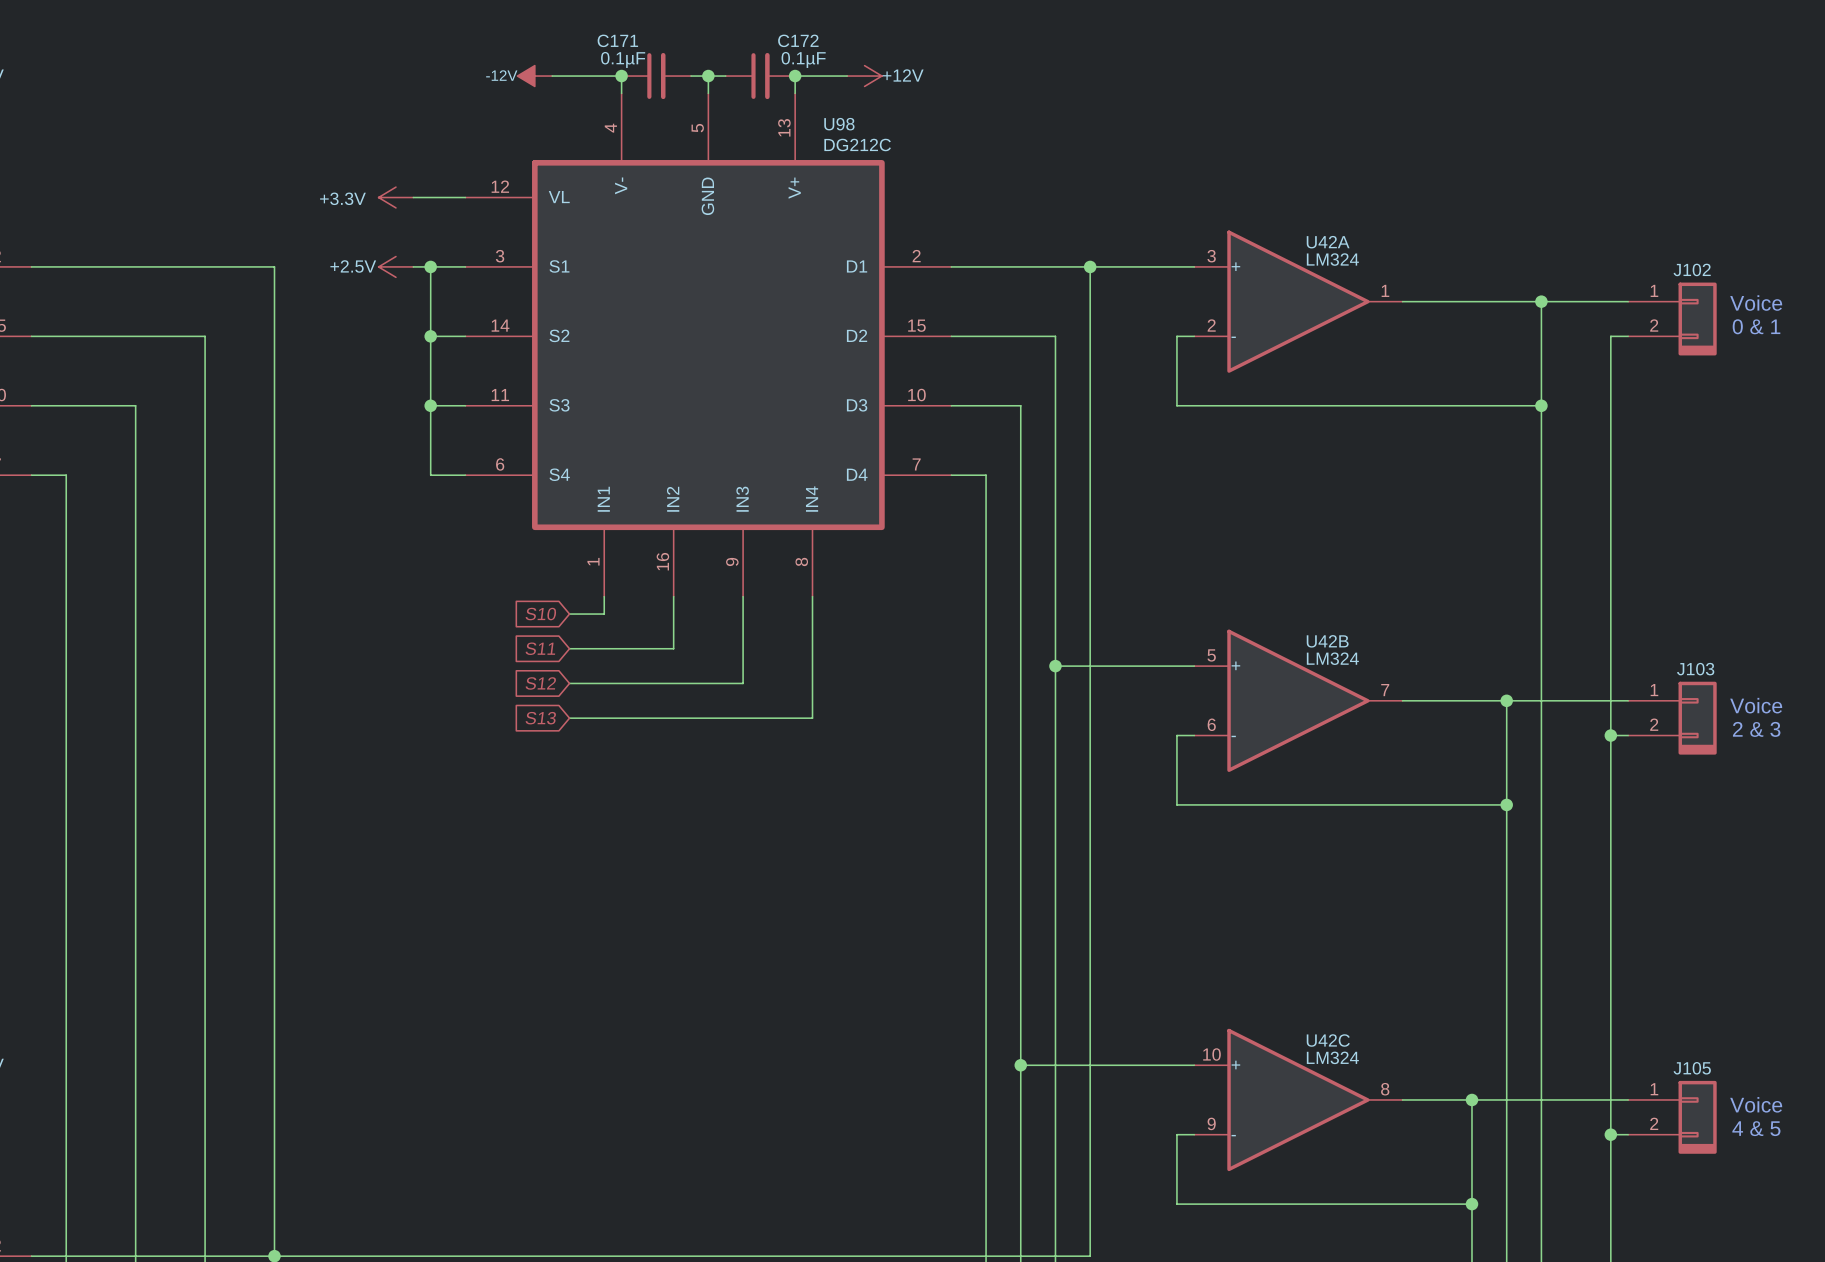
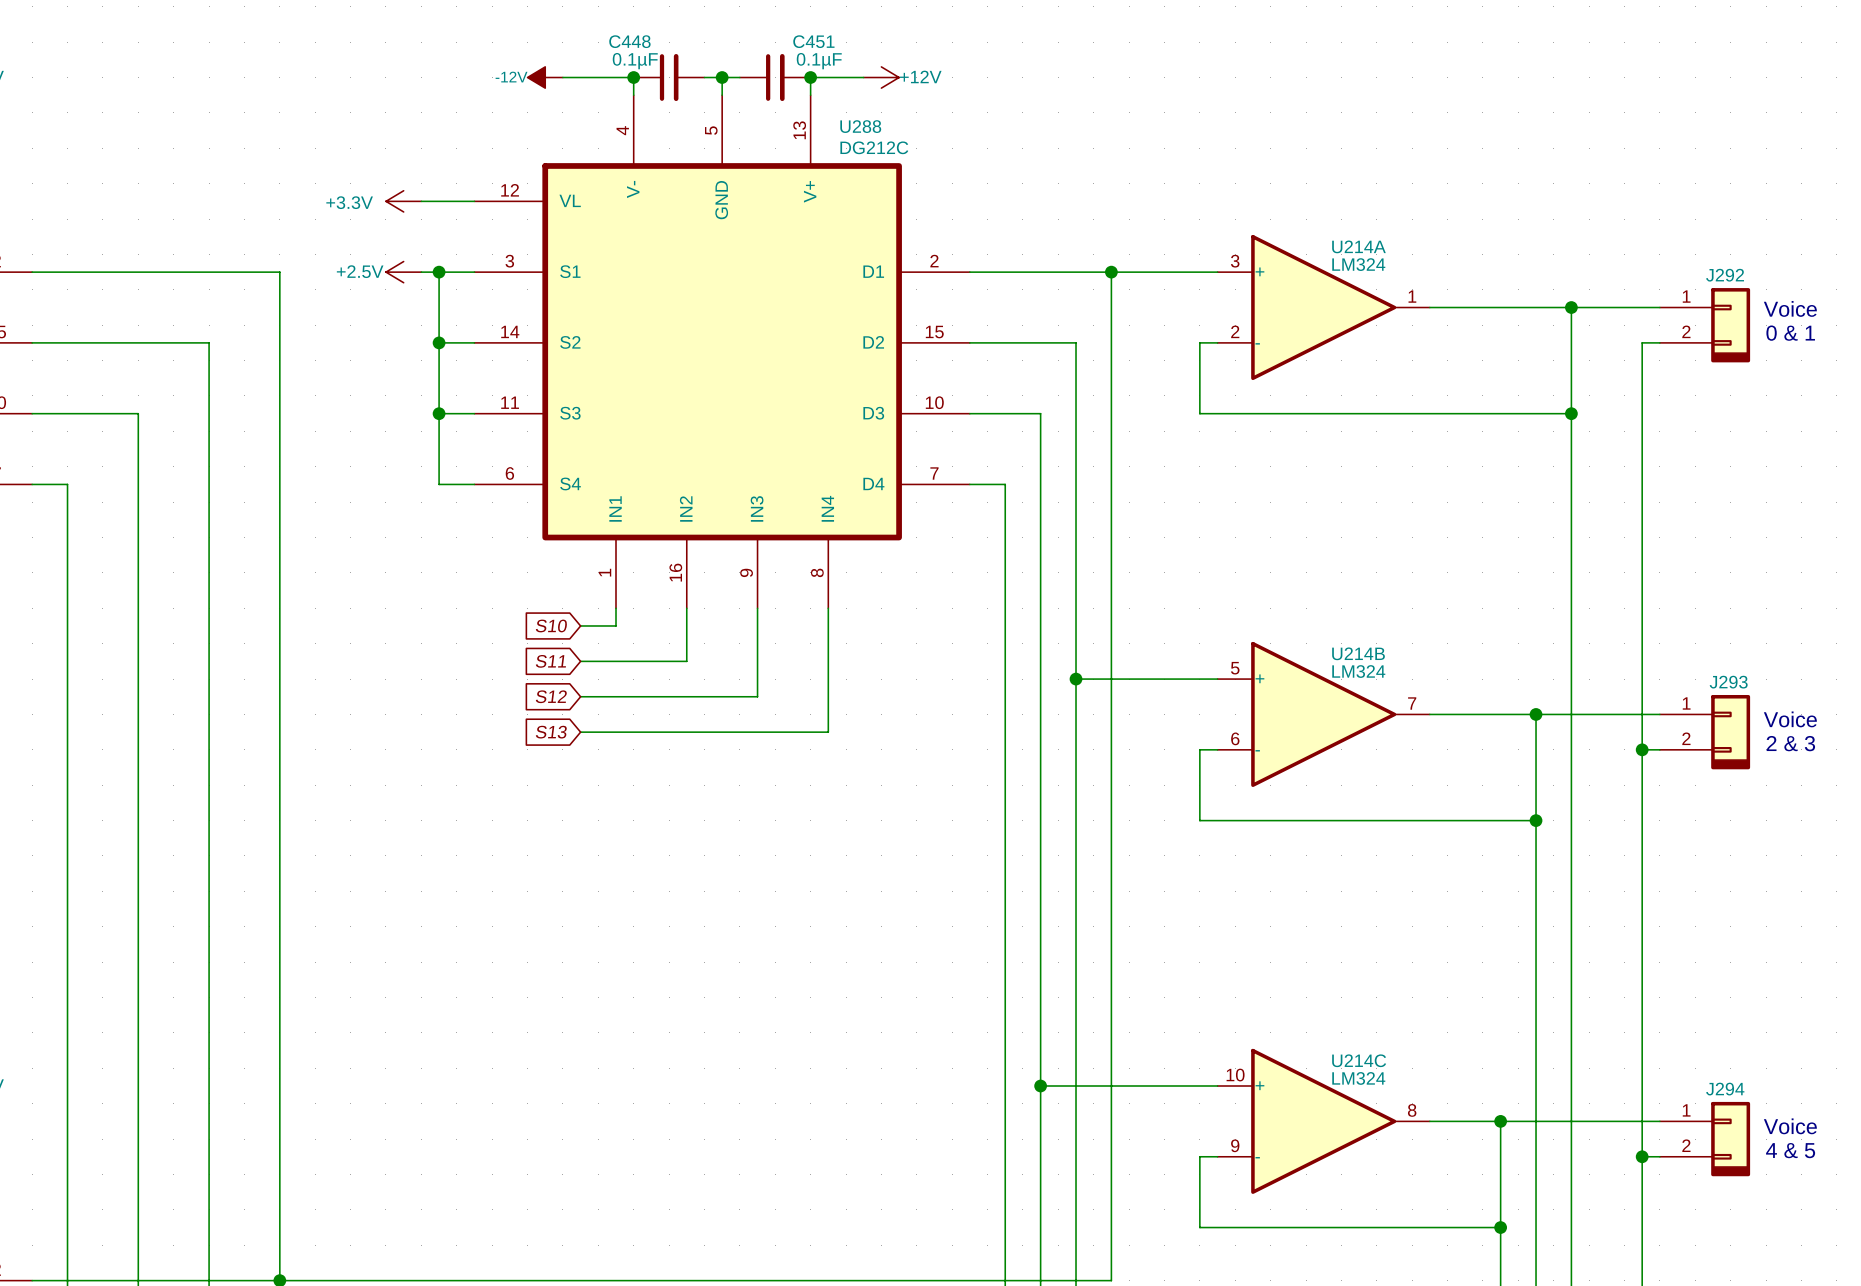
C171 name: C171 (617, 40) -> C448 (629, 41)
C172 name: C172 (798, 40) -> C451 (813, 41)
U98 name: U98 (839, 124) -> U288 (860, 126)
U42A name: U42A (1328, 242) -> U214A (1358, 246)
J102 name: J102 (1692, 269) -> J292 (1725, 275)
U42B name: U42B (1327, 641) -> U214B (1358, 653)
J103 name: J103 (1695, 669) -> J293 (1728, 682)
U42C name: U42C (1328, 1040) -> U214C (1359, 1060)
J105 name: J105 (1692, 1068) -> J294 (1725, 1089)

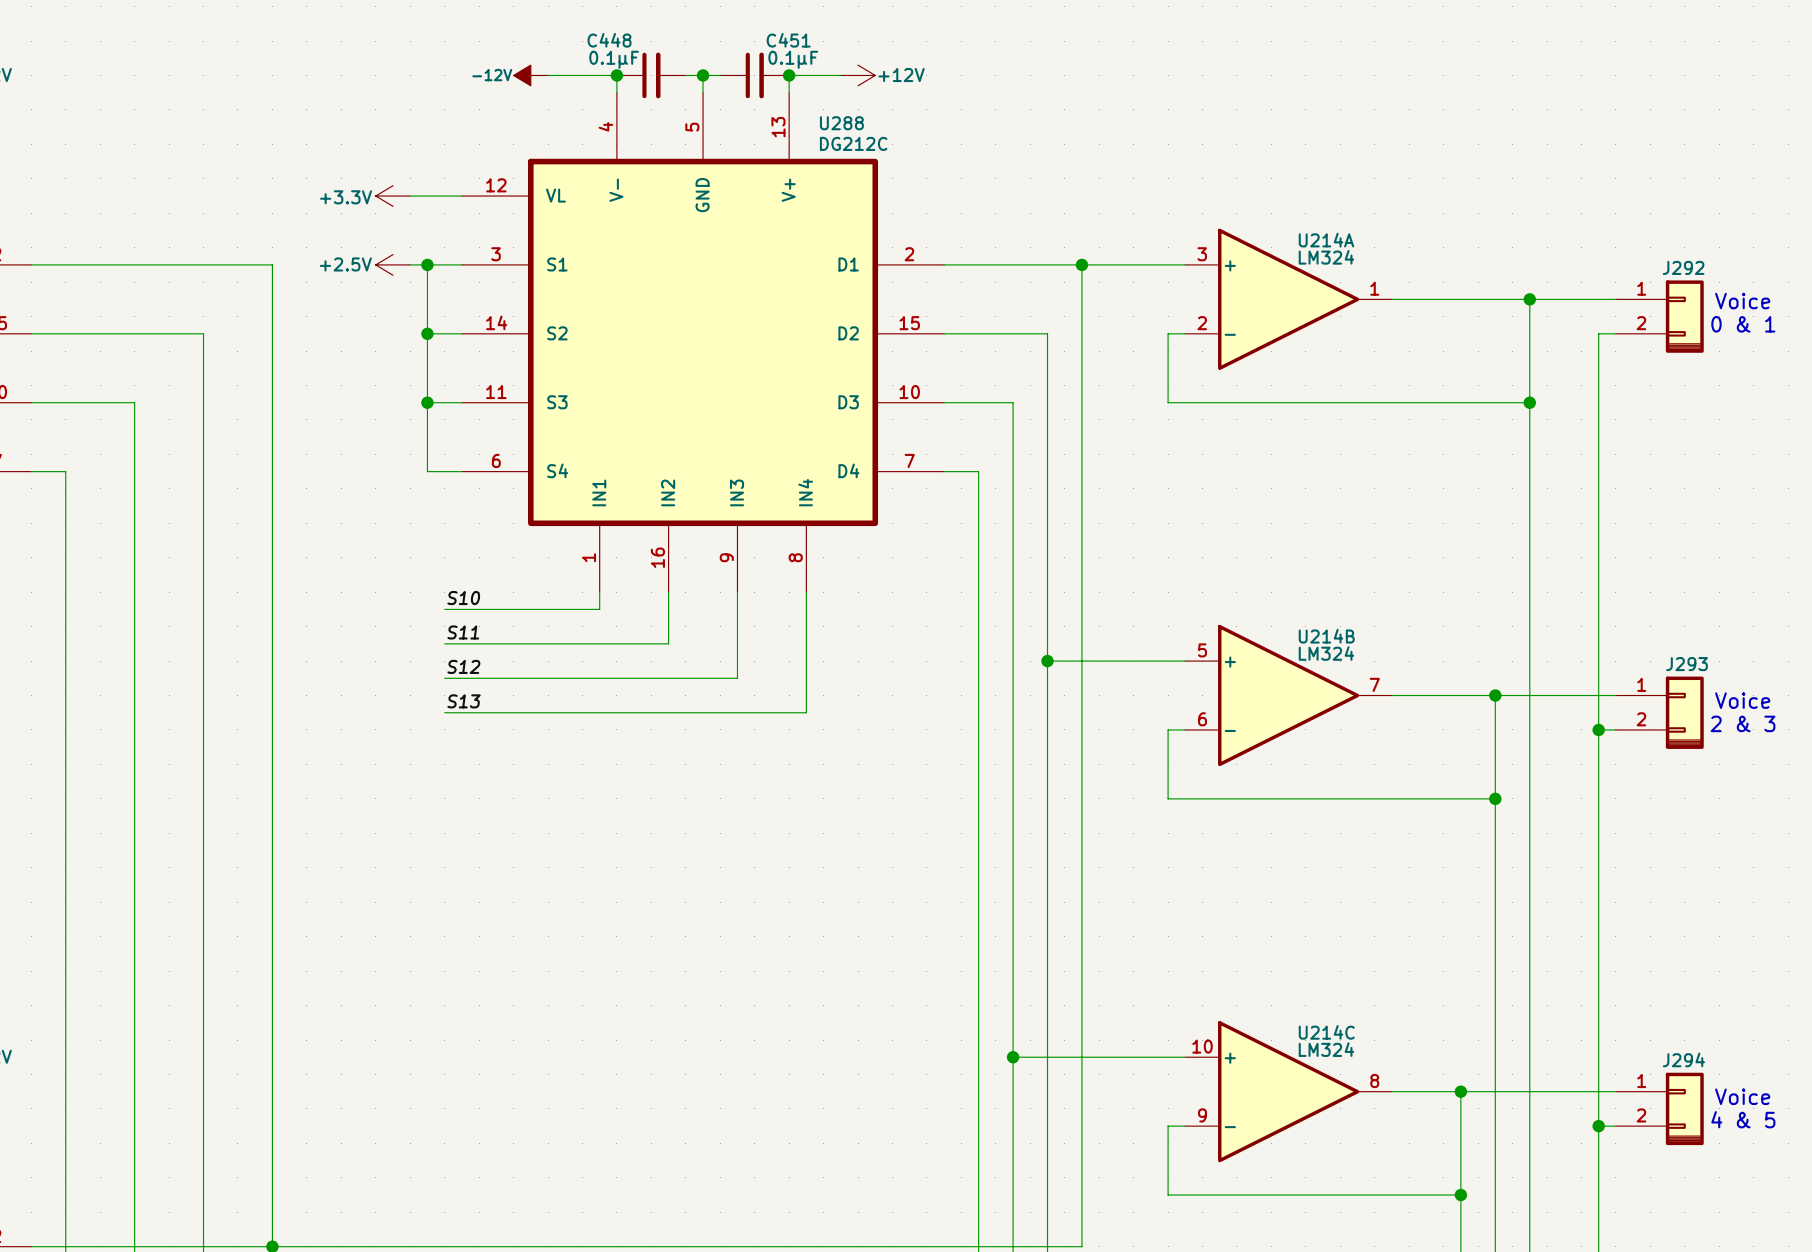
label: none -> S10 (463, 598)
wire: none -> (444, 609) (565, 609)
global label: S10 (551, 625) -> none
label: none -> S11 (463, 632)
wire: none -> (444, 643) (565, 643)
global label: S11 (550, 661) -> none
label: none -> S12 (463, 666)
wire: none -> (444, 678) (565, 678)
global label: S12 (551, 696) -> none
label: none -> S13 (464, 701)
wire: none -> (444, 712) (565, 712)
global label: S13 (551, 732) -> none

